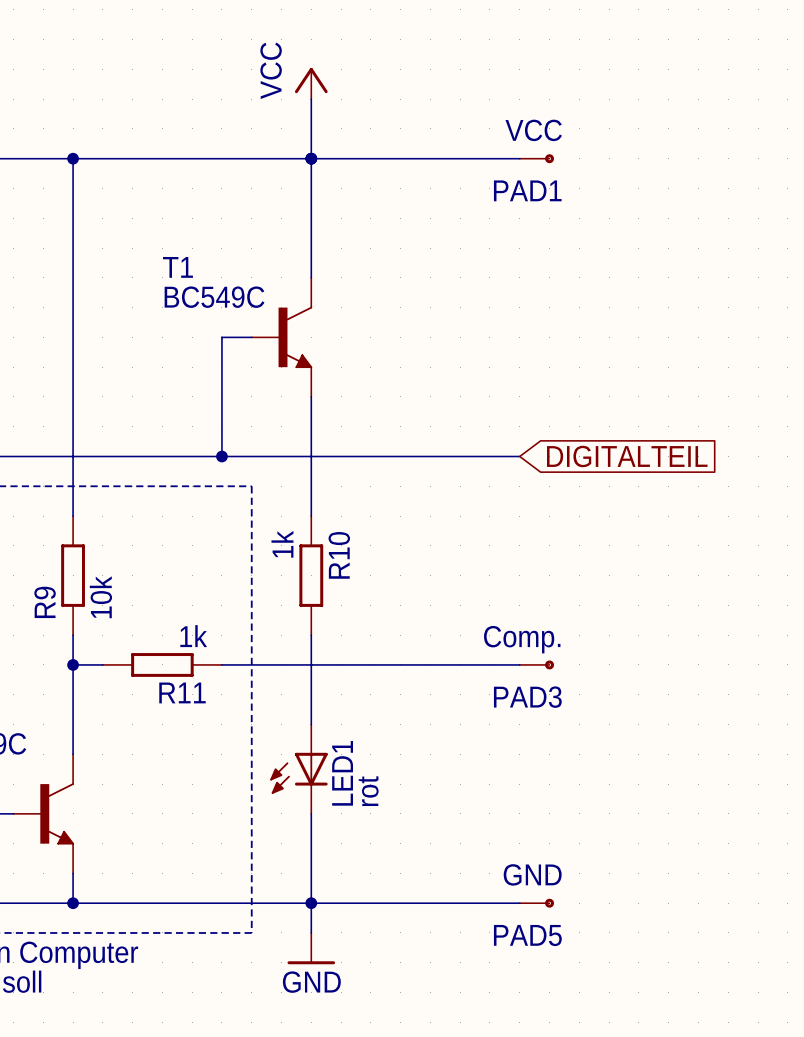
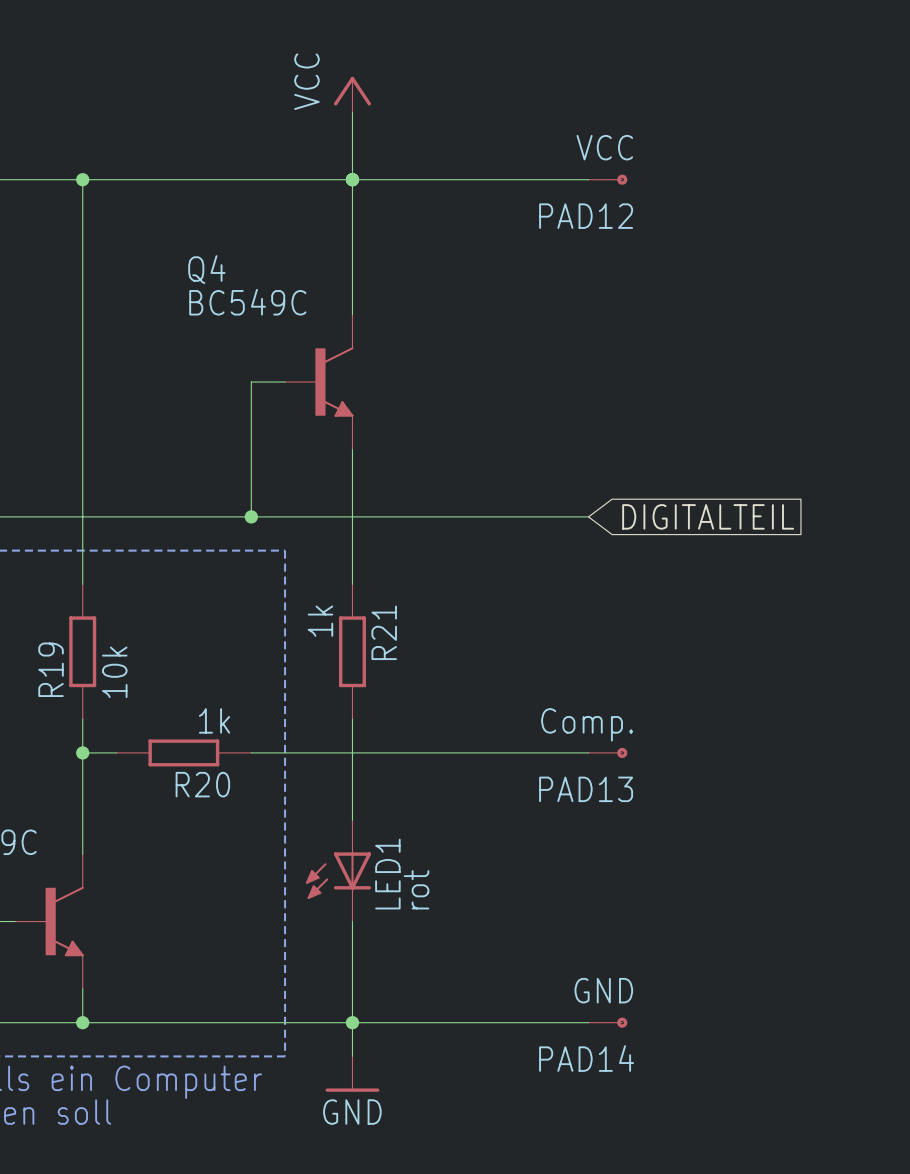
PAD1 name: PAD1 (527, 190) -> PAD12 (586, 216)
T1 name: T1 (177, 267) -> Q4 (206, 269)
T1 value position: BC549C (214, 297) -> BC549C (247, 302)
R10 name: R10 (339, 555) -> R21 (384, 632)
R9 name: R9 (45, 602) -> R19 (51, 669)
R11 name: R11 (182, 692) -> R20 (202, 784)
PAD3 name: PAD3 (527, 697) -> PAD13 (586, 789)
PAD5 name: PAD5 (527, 935) -> PAD14 (586, 1058)

